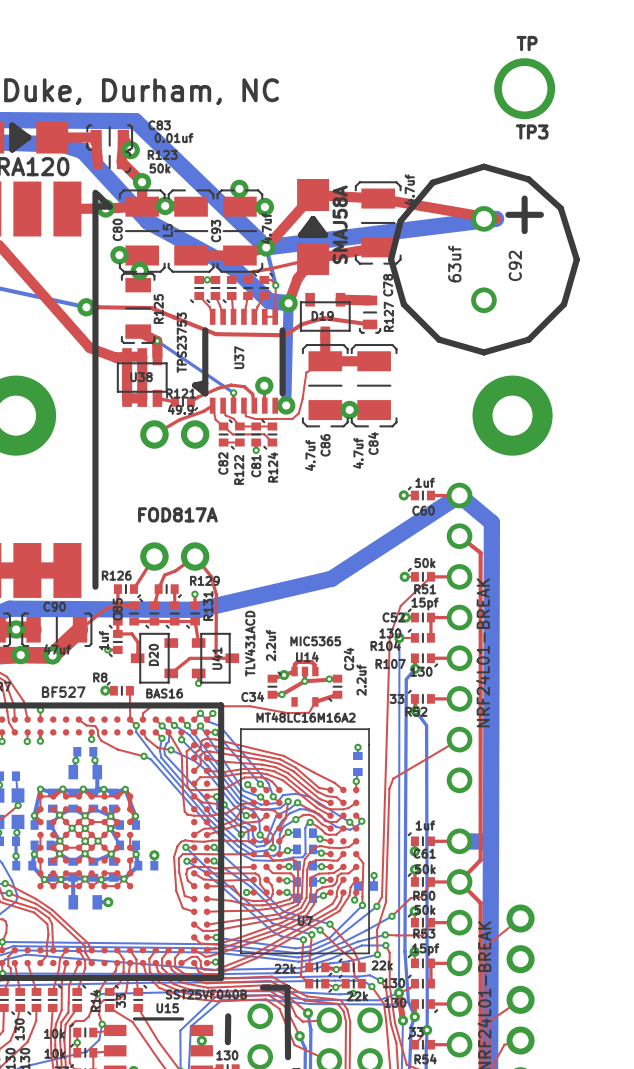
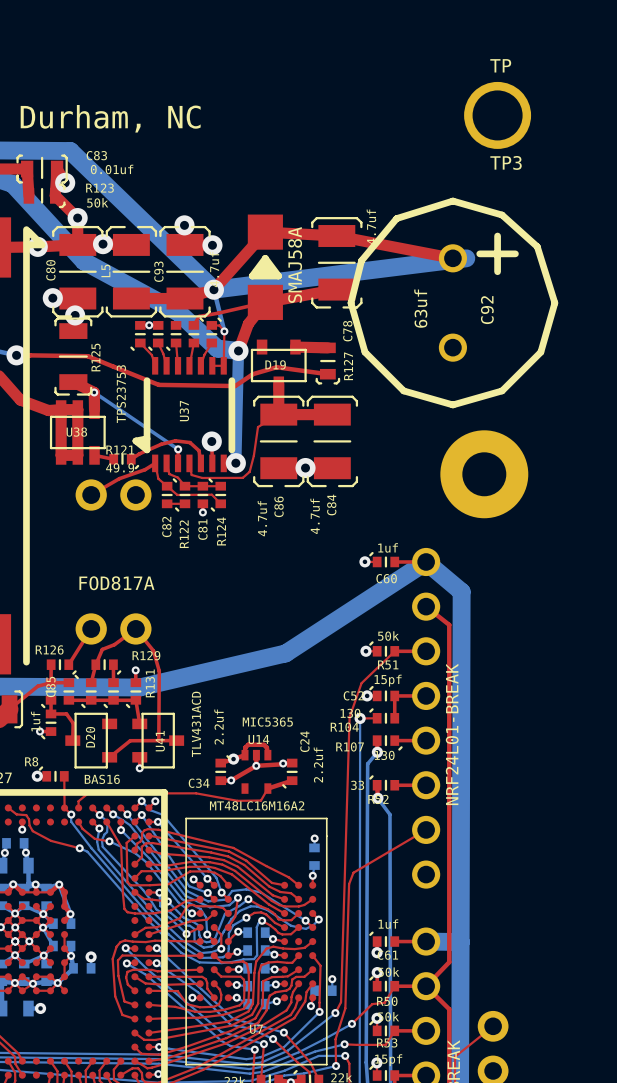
top track: (378, 198) (496, 218) -> (336, 236) (452, 258)

